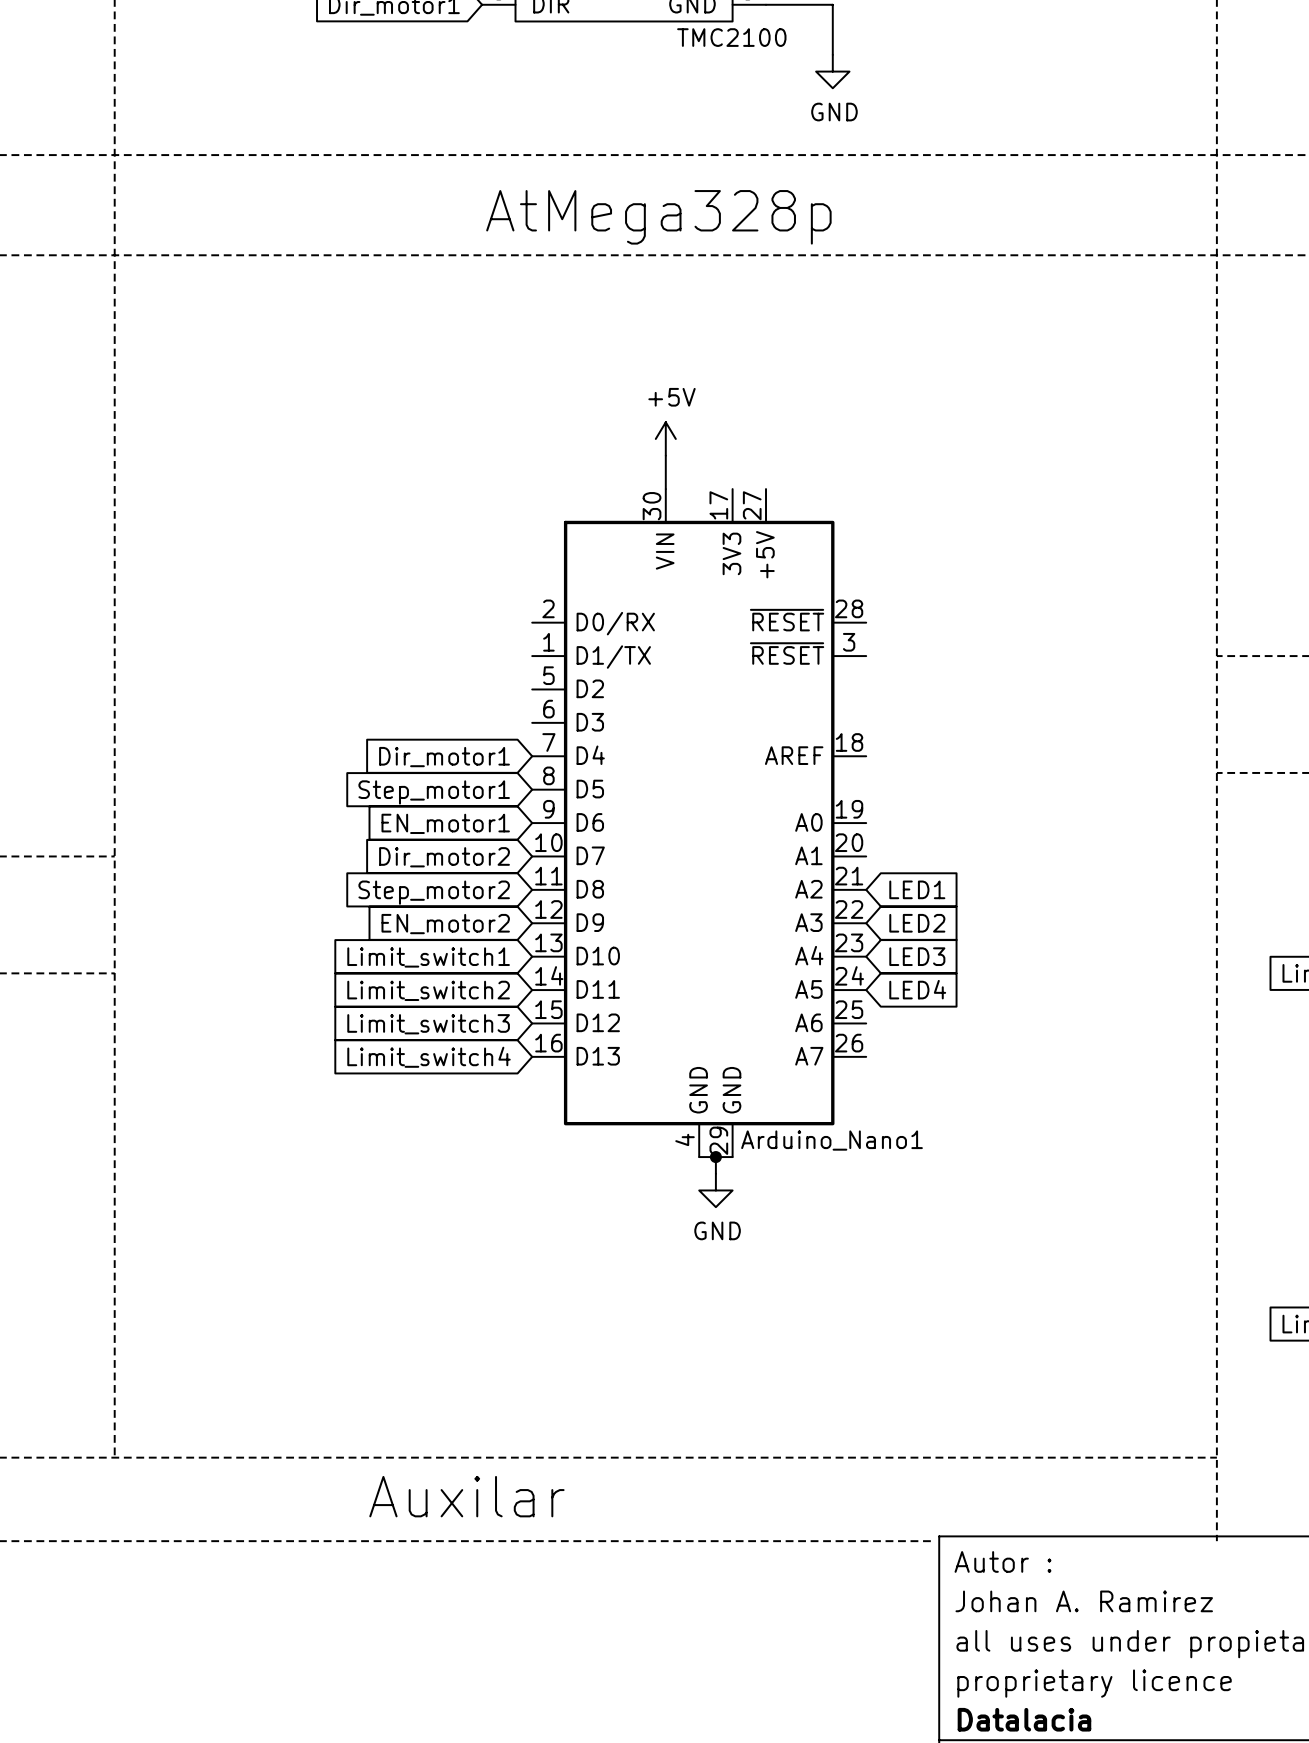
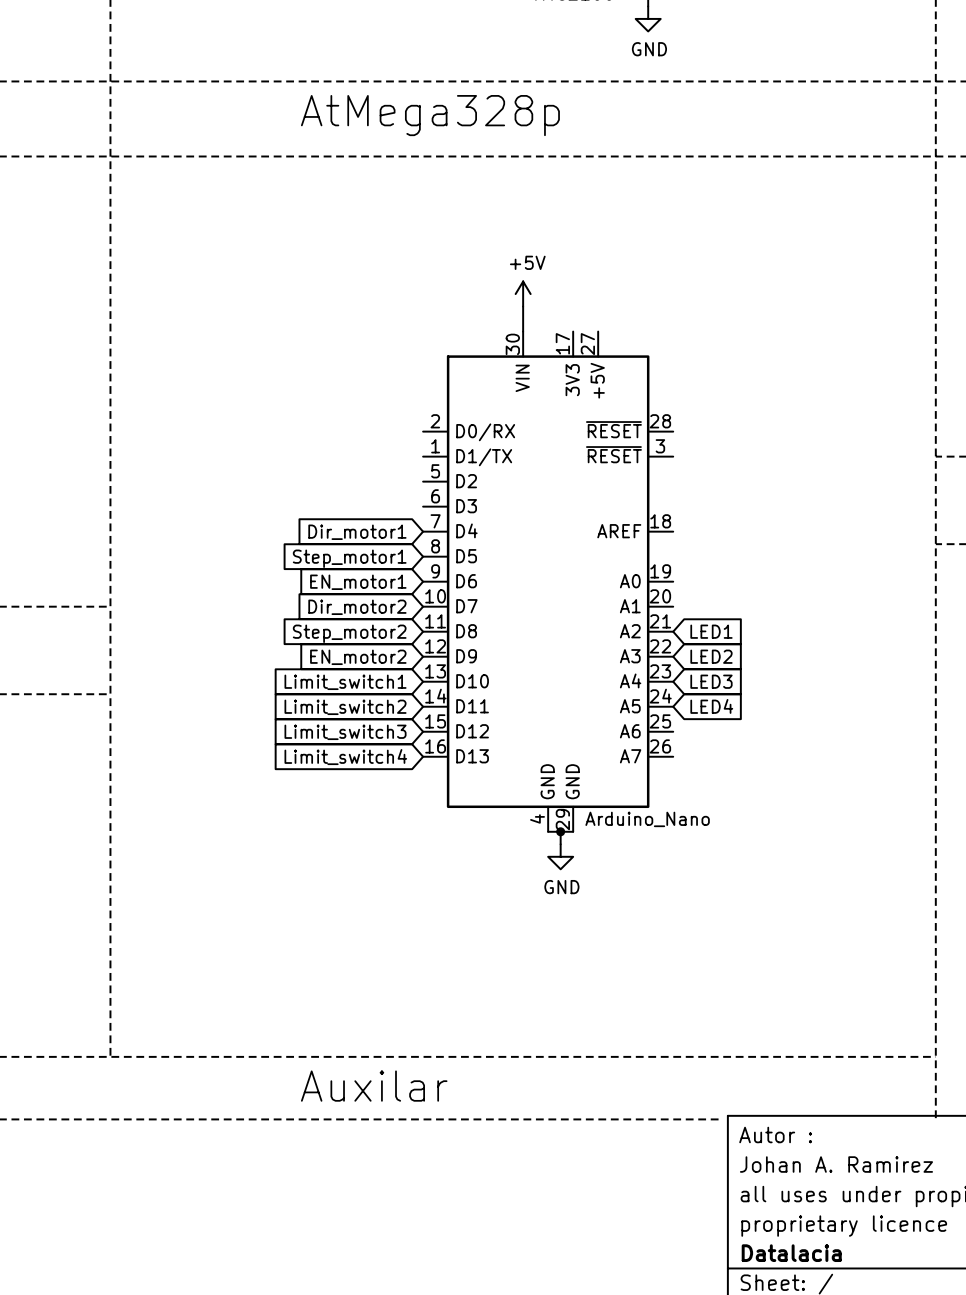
text position: AtMega328p (658, 217) -> AtMega328p (430, 115)
Arduino_Nano1 name: Arduino_Nano1 (832, 1140) -> Arduino_Nano (647, 819)

